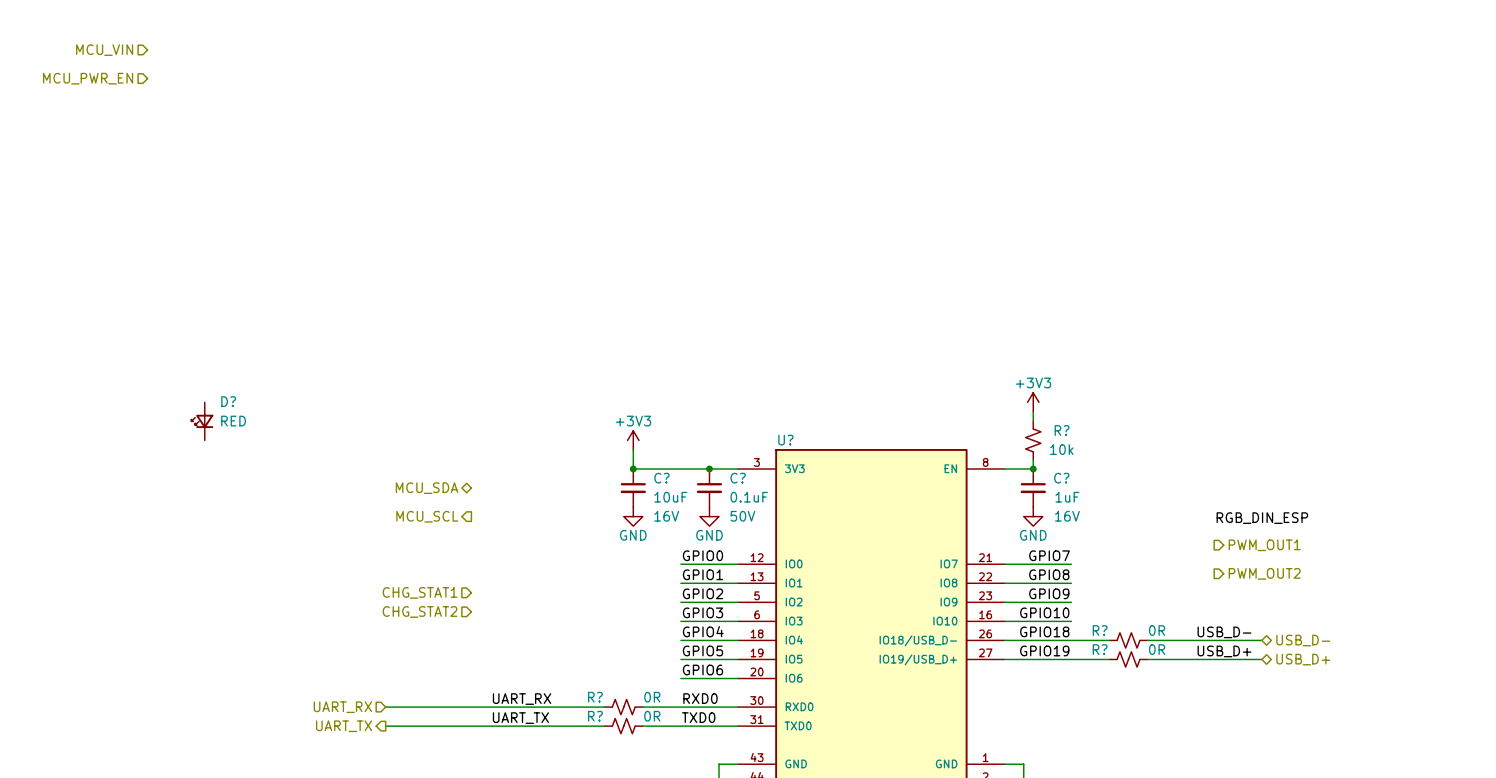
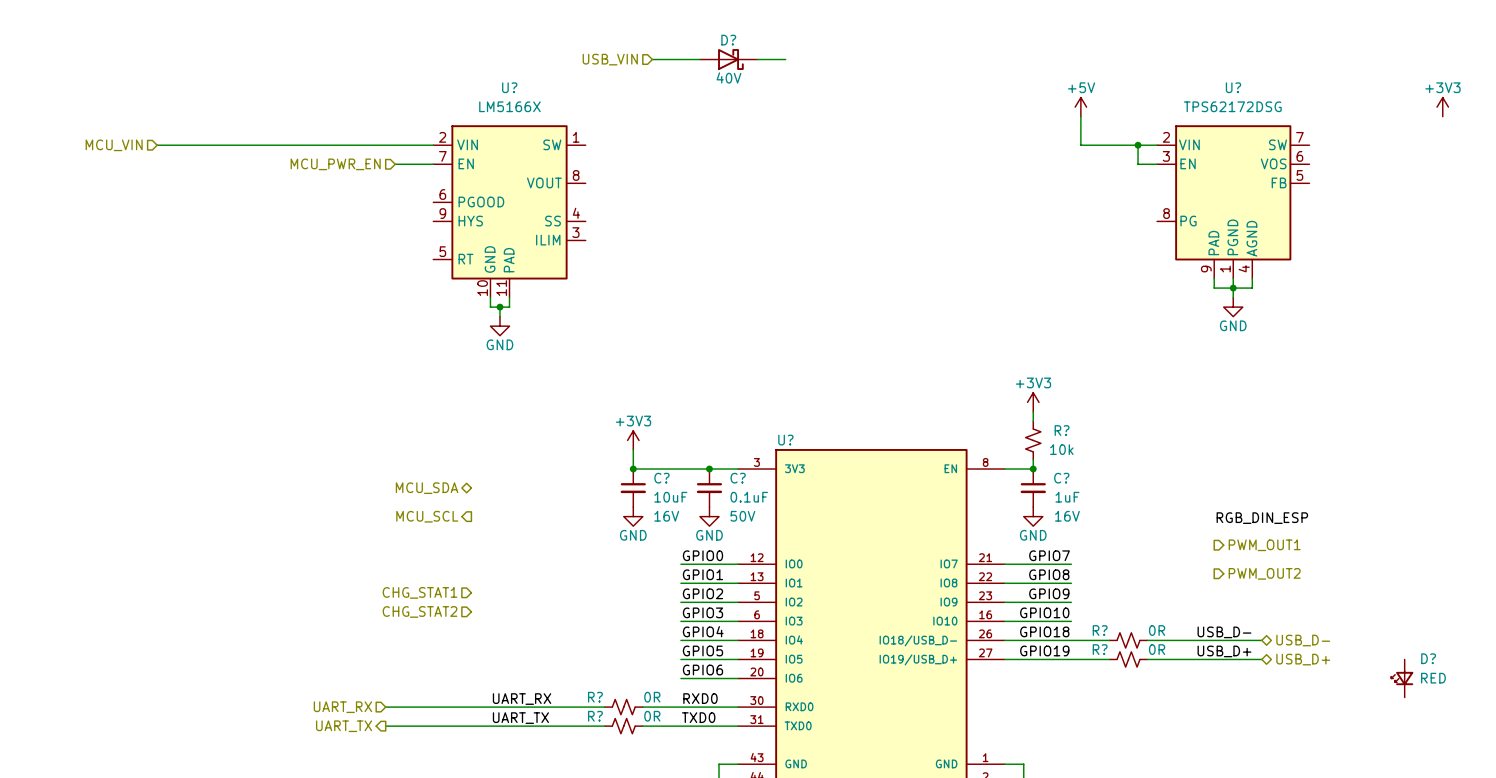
hierarchical label position: MCU_VIN (104, 50) -> MCU_VIN (114, 145)
hierarchical label: none -> USB_VIN (610, 59)
wire: none -> (652, 59) (699, 59)
D?: none -> (728, 59)
wire: none -> (757, 59) (785, 59)
hierarchical label: MCU_PWR_EN (88, 78) -> none
power symbol: none -> +5V (1080, 107)
power symbol: none -> +3V3 (1442, 107)
wire: none -> (1080, 116) (1080, 145) (1157, 145)
wire: none -> (157, 145) (433, 145)
wire: none -> (1138, 145) (1138, 164) (1157, 164)
junction: none -> (1138, 145)
hierarchical label: none -> MCU_PWR_EN (335, 164)
wire: none -> (395, 164) (433, 164)
U?: none -> TPS62172DSG (1233, 201)
U?: none -> LM5166X (509, 211)
wire: none -> (1214, 278) (1214, 288) (1252, 288) (1252, 278)
wire: none -> (1233, 278) (1233, 297)
junction: none -> (1233, 288)
wire: none -> (490, 297) (490, 307) (509, 307) (509, 297)
wire: none -> (499, 307) (499, 316)
junction: none -> (499, 307)
power symbol: none -> GND (1233, 307)
power symbol: none -> GND (499, 326)
D?: RED (202, 421) -> none
D?: none -> RED (1402, 678)

